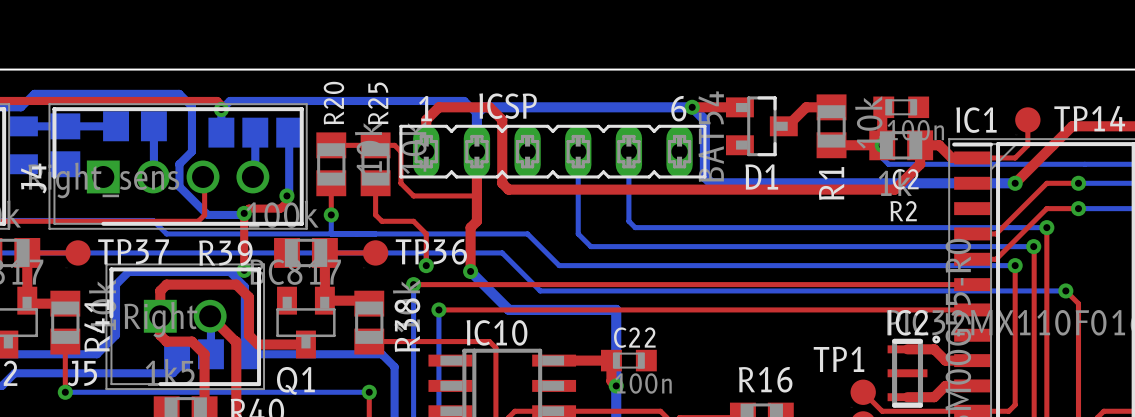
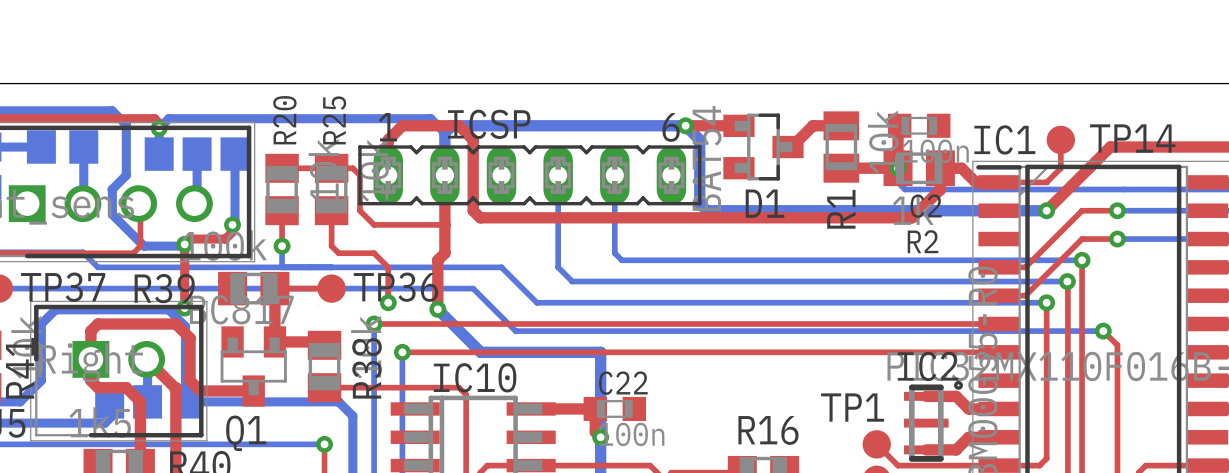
R1 footprint: [816, 94, 847, 159] -> [823, 111, 860, 183]
R2 footprint: [869, 130, 934, 161] -> [883, 150, 955, 187]

